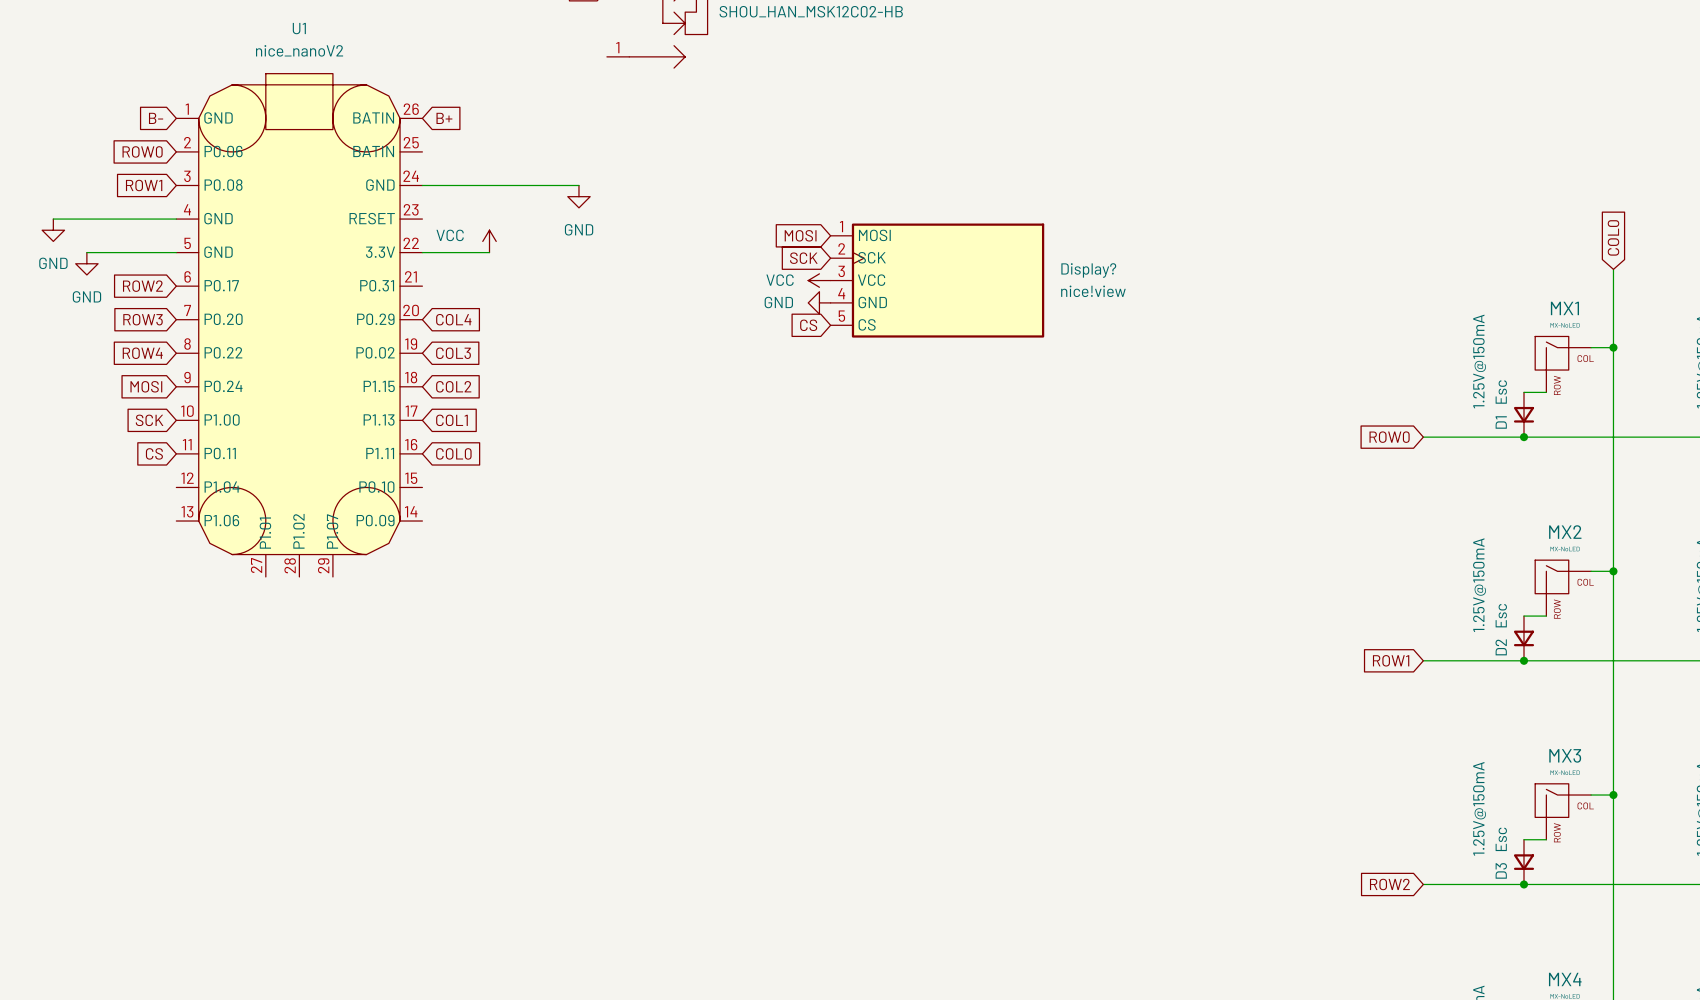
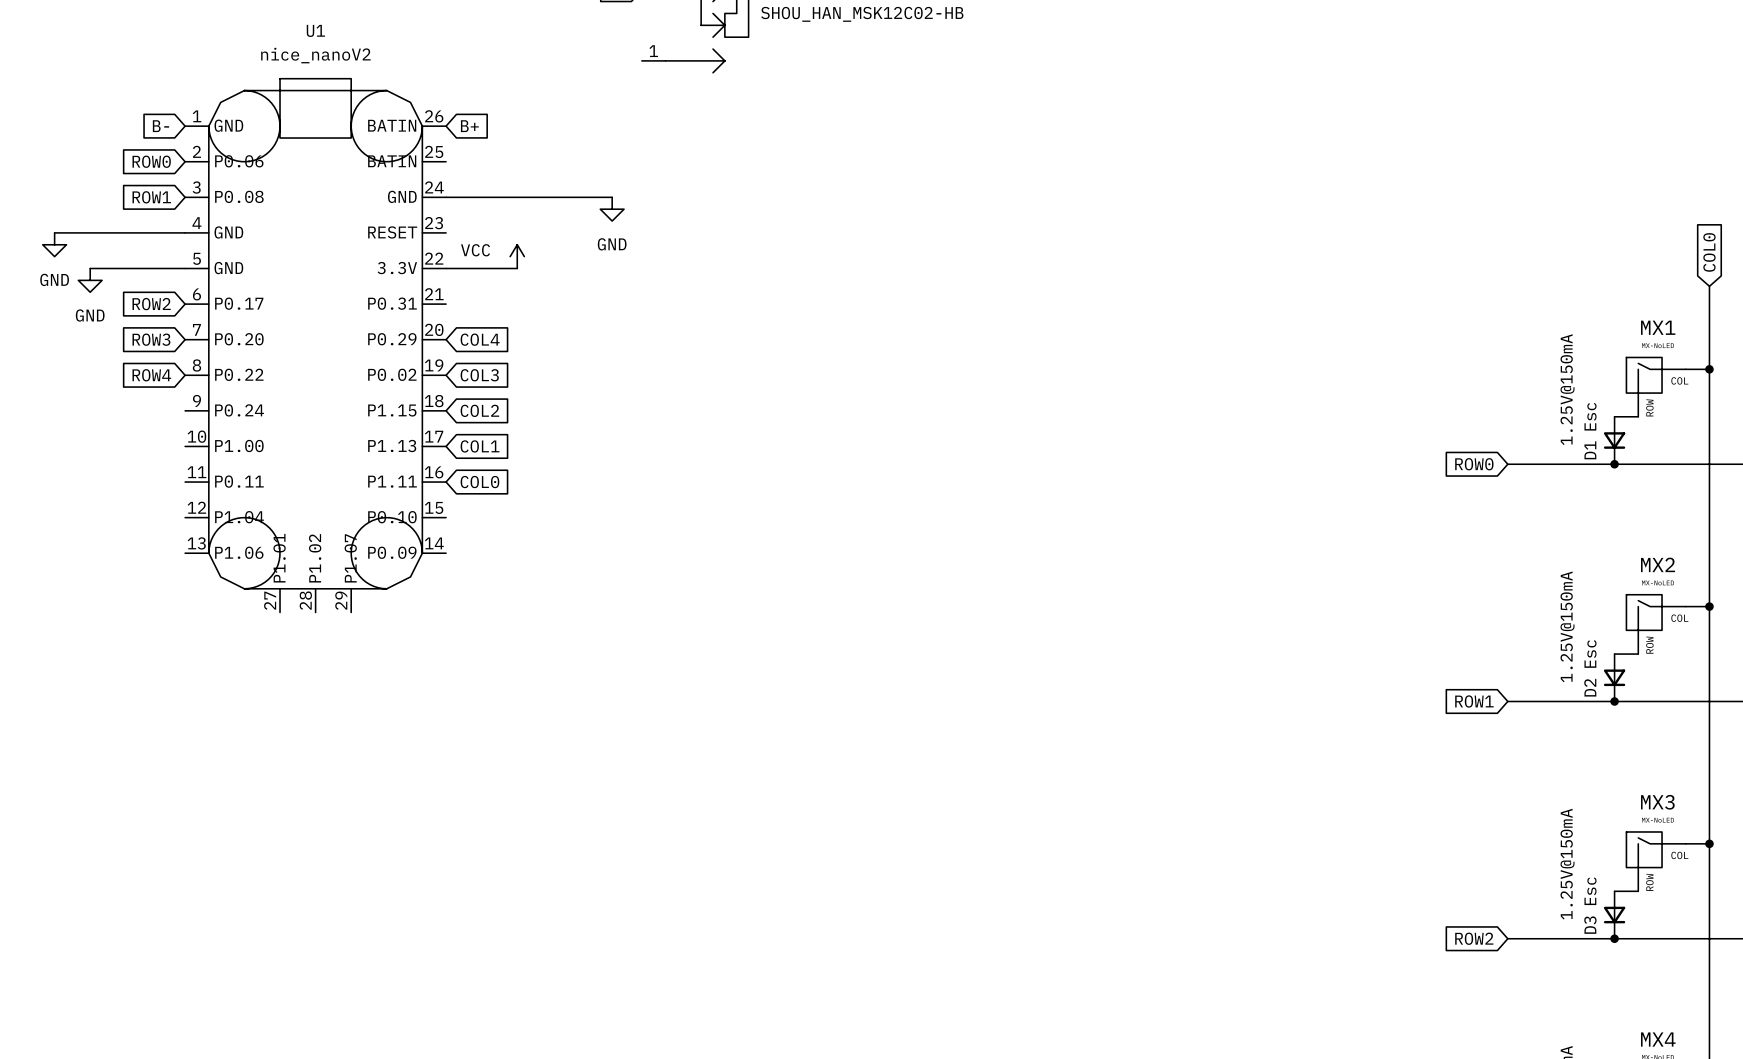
global label: MOSI (800, 235) -> none
global label: SCK (803, 258) -> none
power symbol: VCC (819, 280) -> none
Display?: nice!view (937, 280) -> none
power symbol: GND (819, 302) -> none
global label: CS (808, 325) -> none
global label: MOSI (146, 386) -> none
global label: SCK (149, 420) -> none
global label: CS (154, 453) -> none

